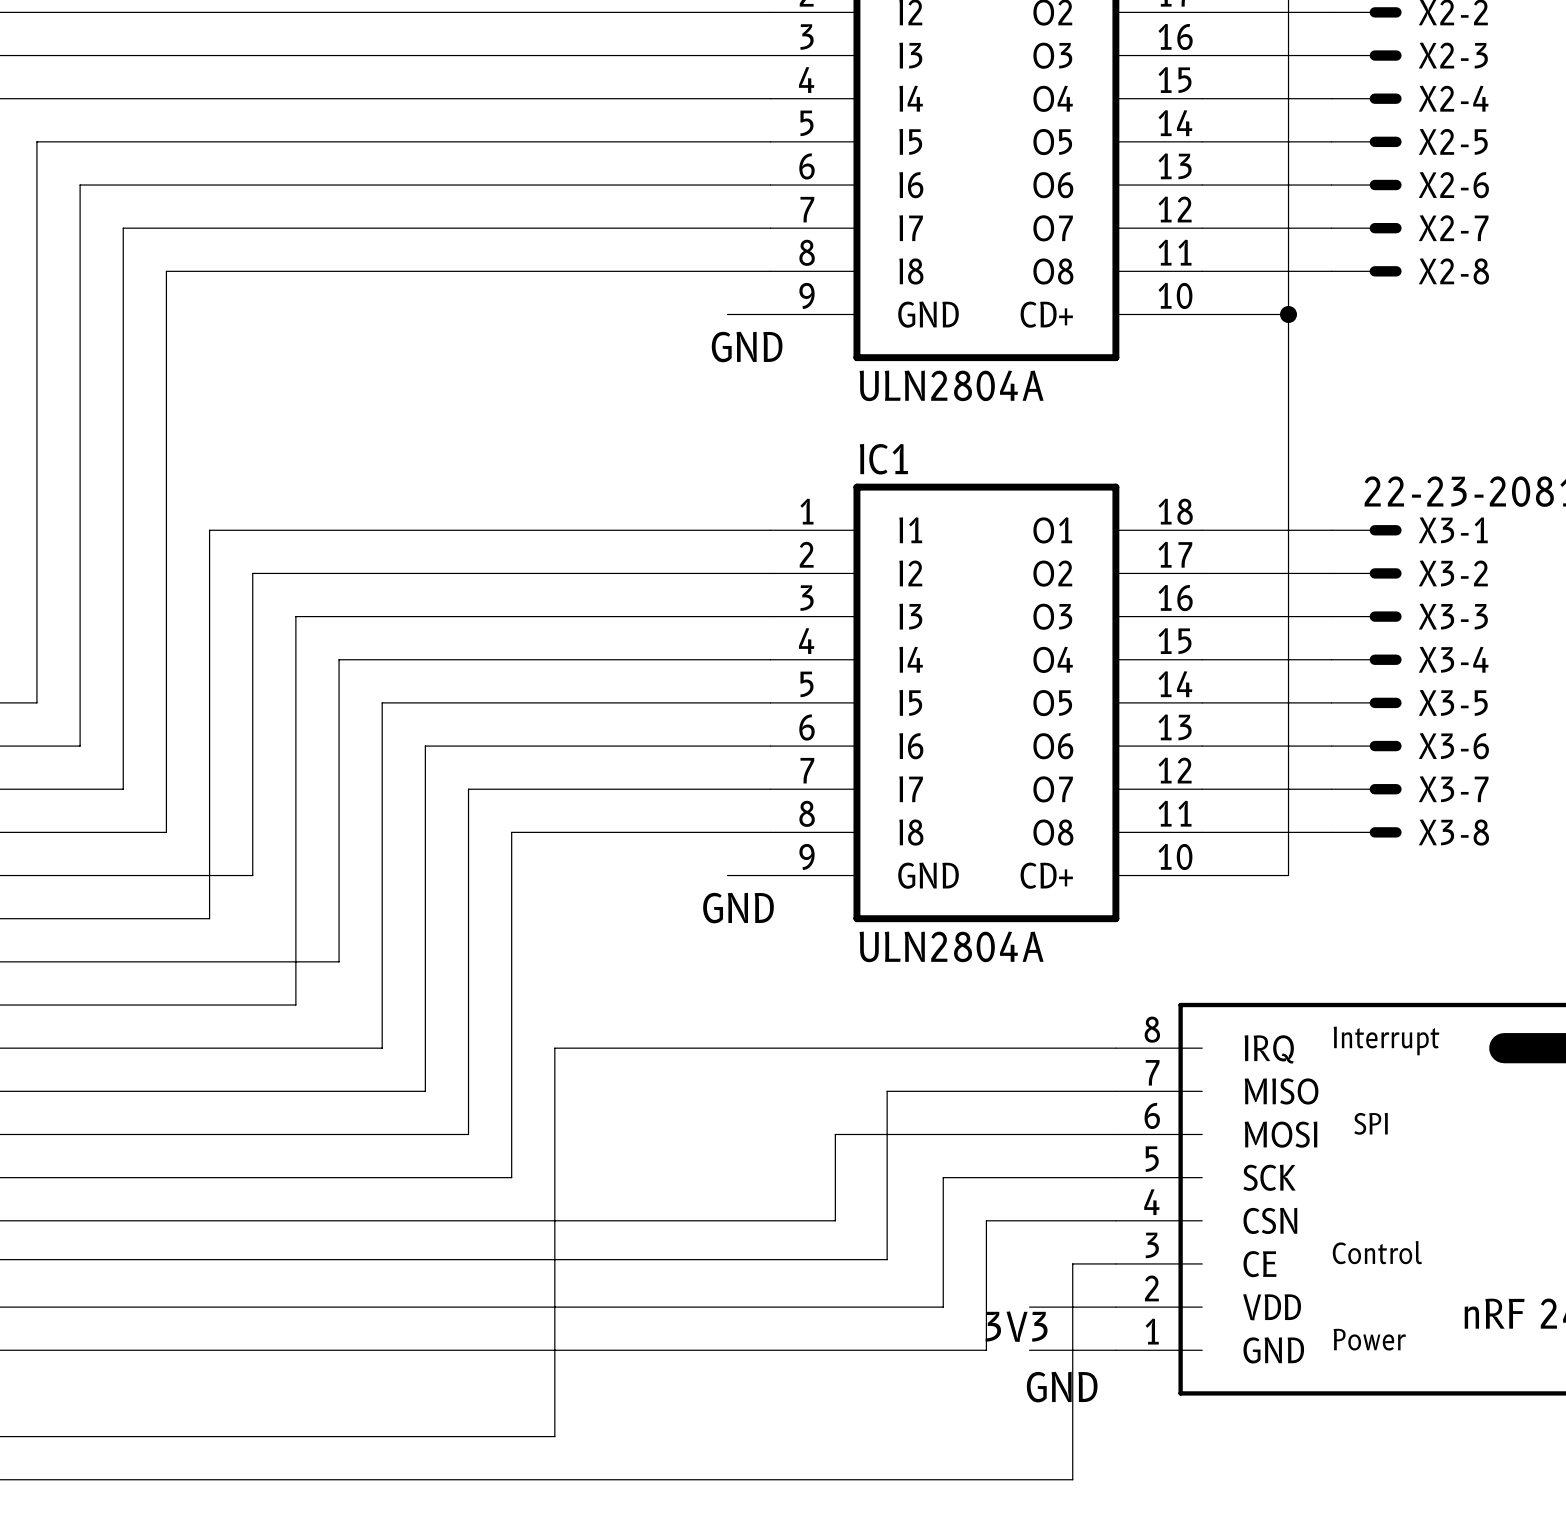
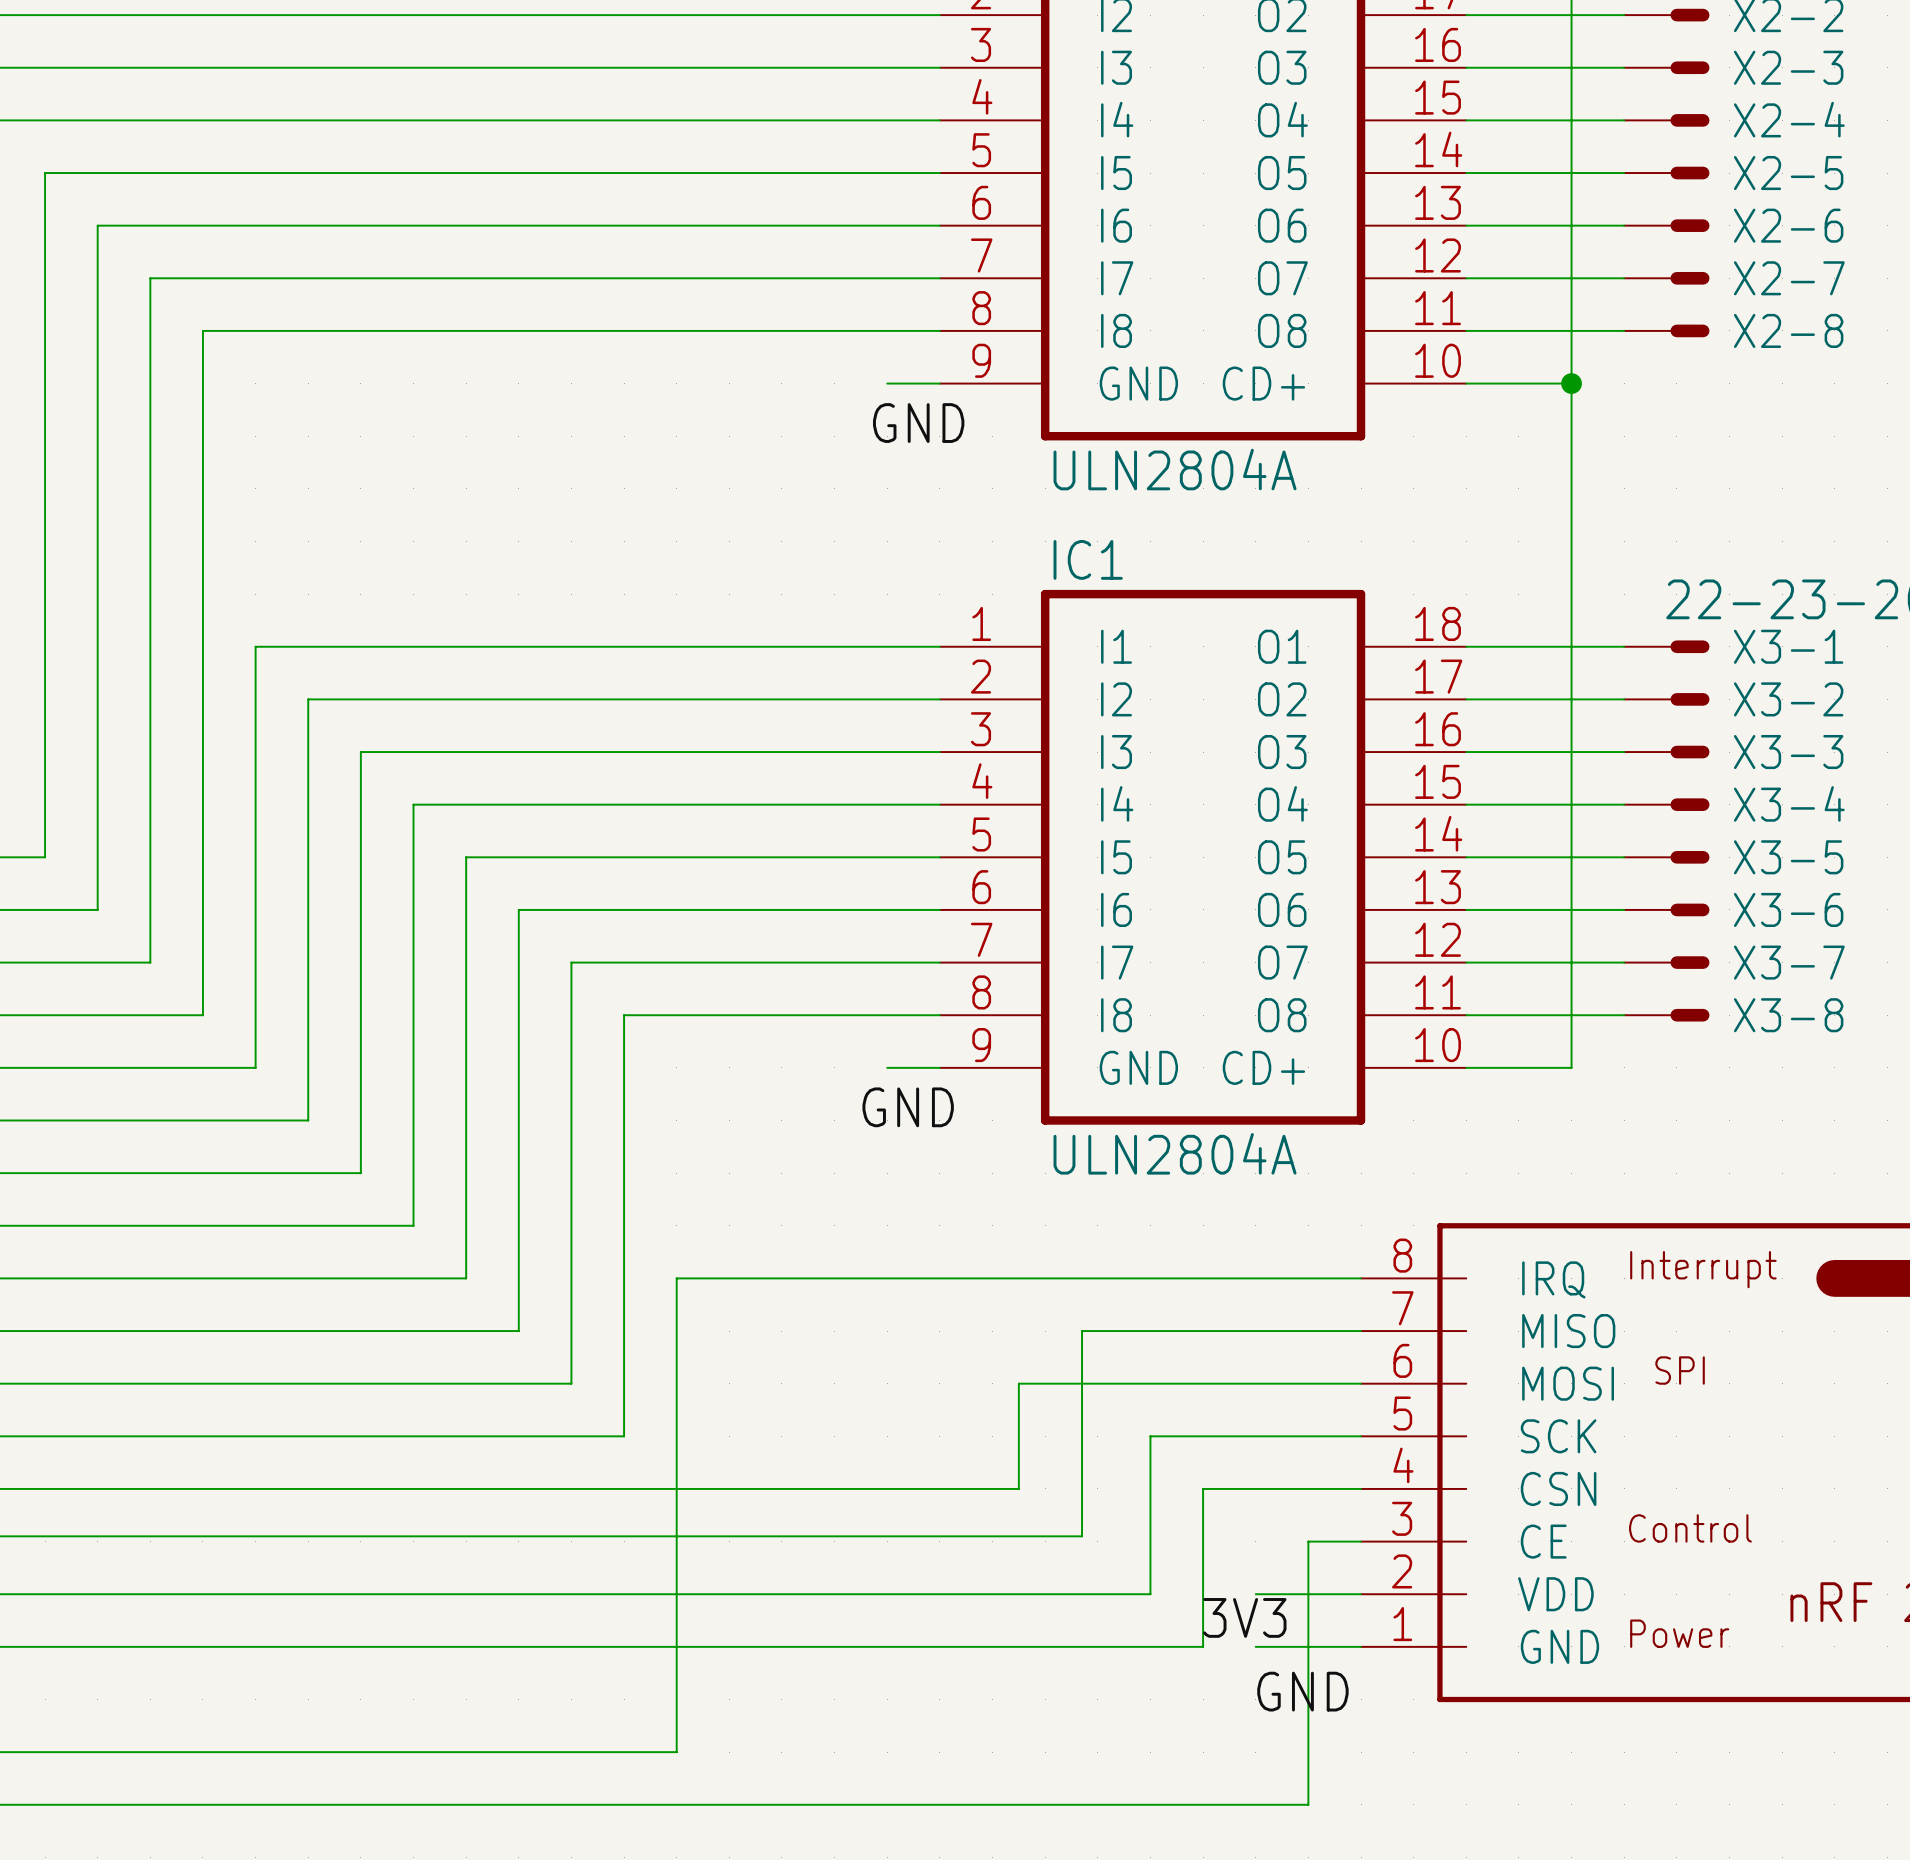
wire: (252, 875) (209, 875) (209, 918) -> (308, 1067) (308, 1120) (255, 1120)
wire: (339, 961) (295, 961) (295, 1005) -> (413, 1173) (413, 1225) (360, 1225)

